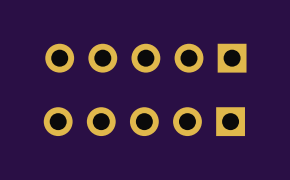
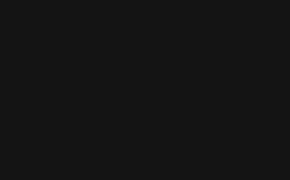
part: (145, 58) -> none
part: (144, 121) -> none

